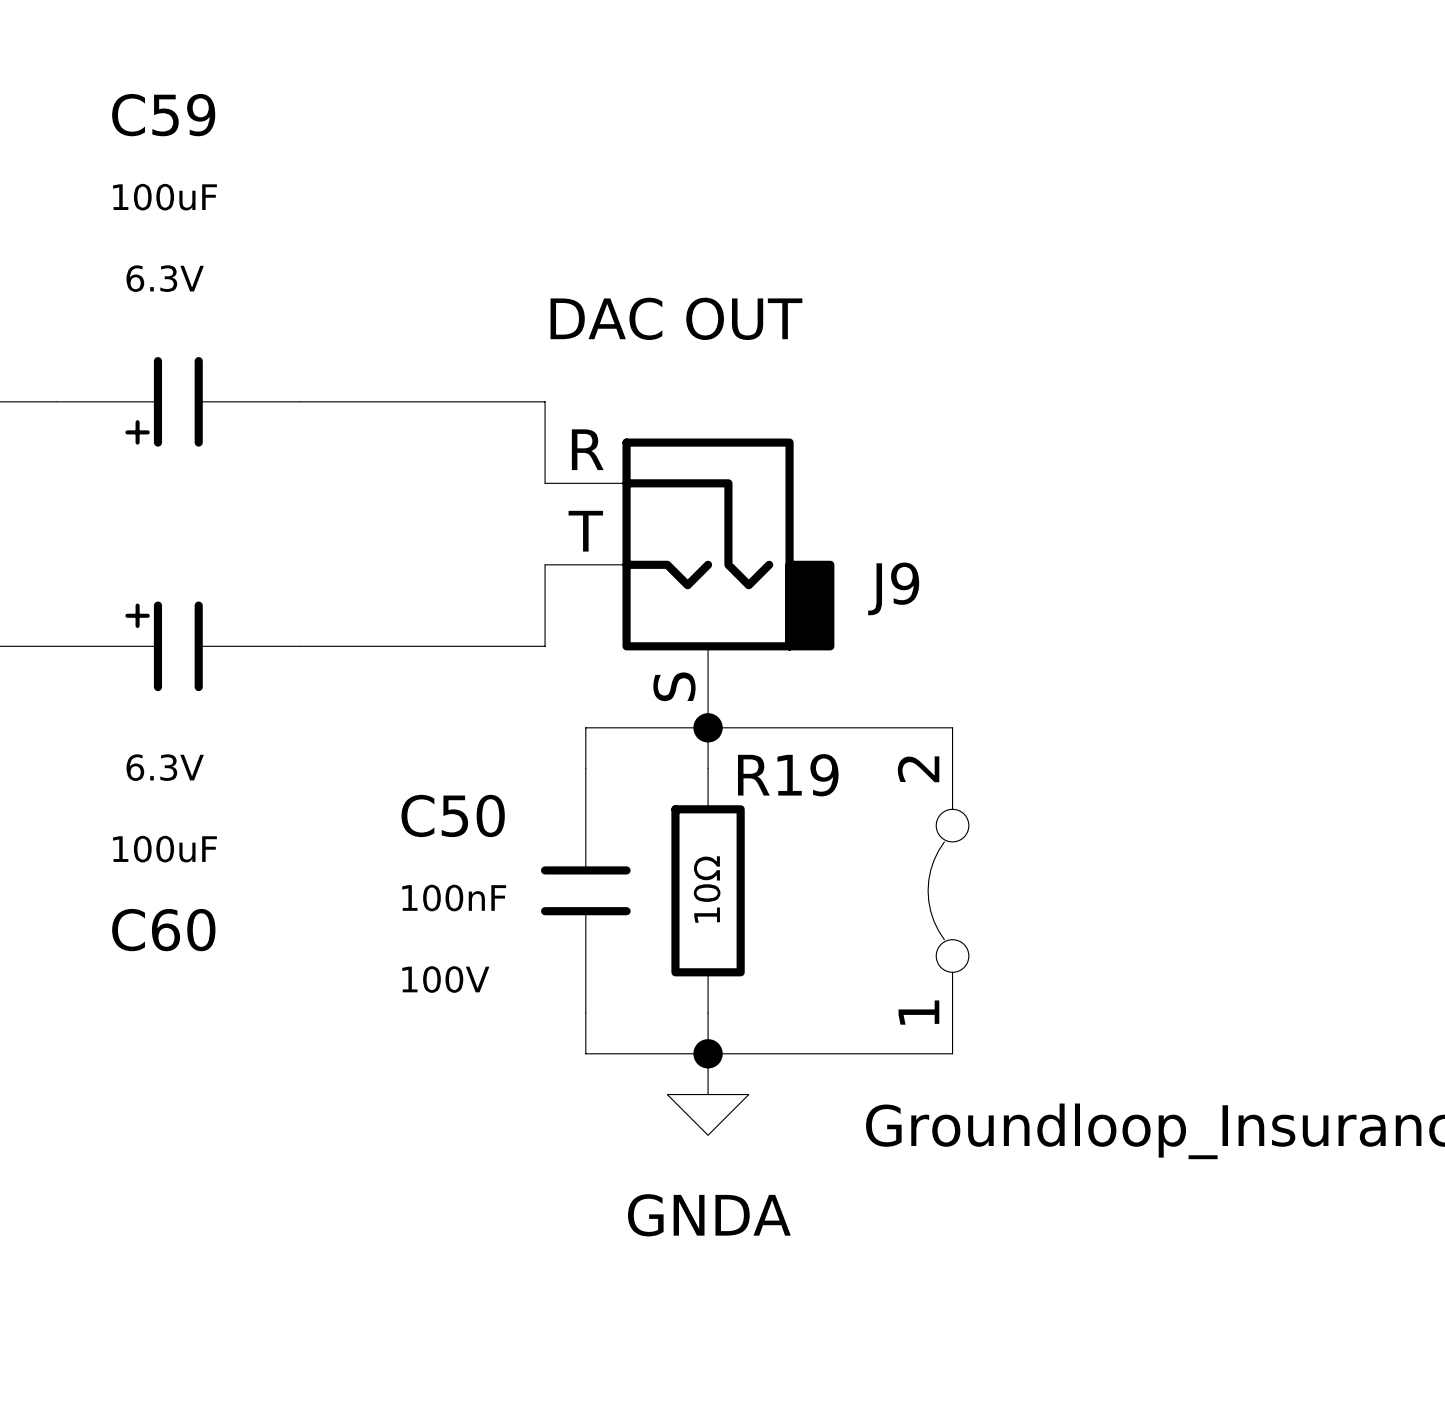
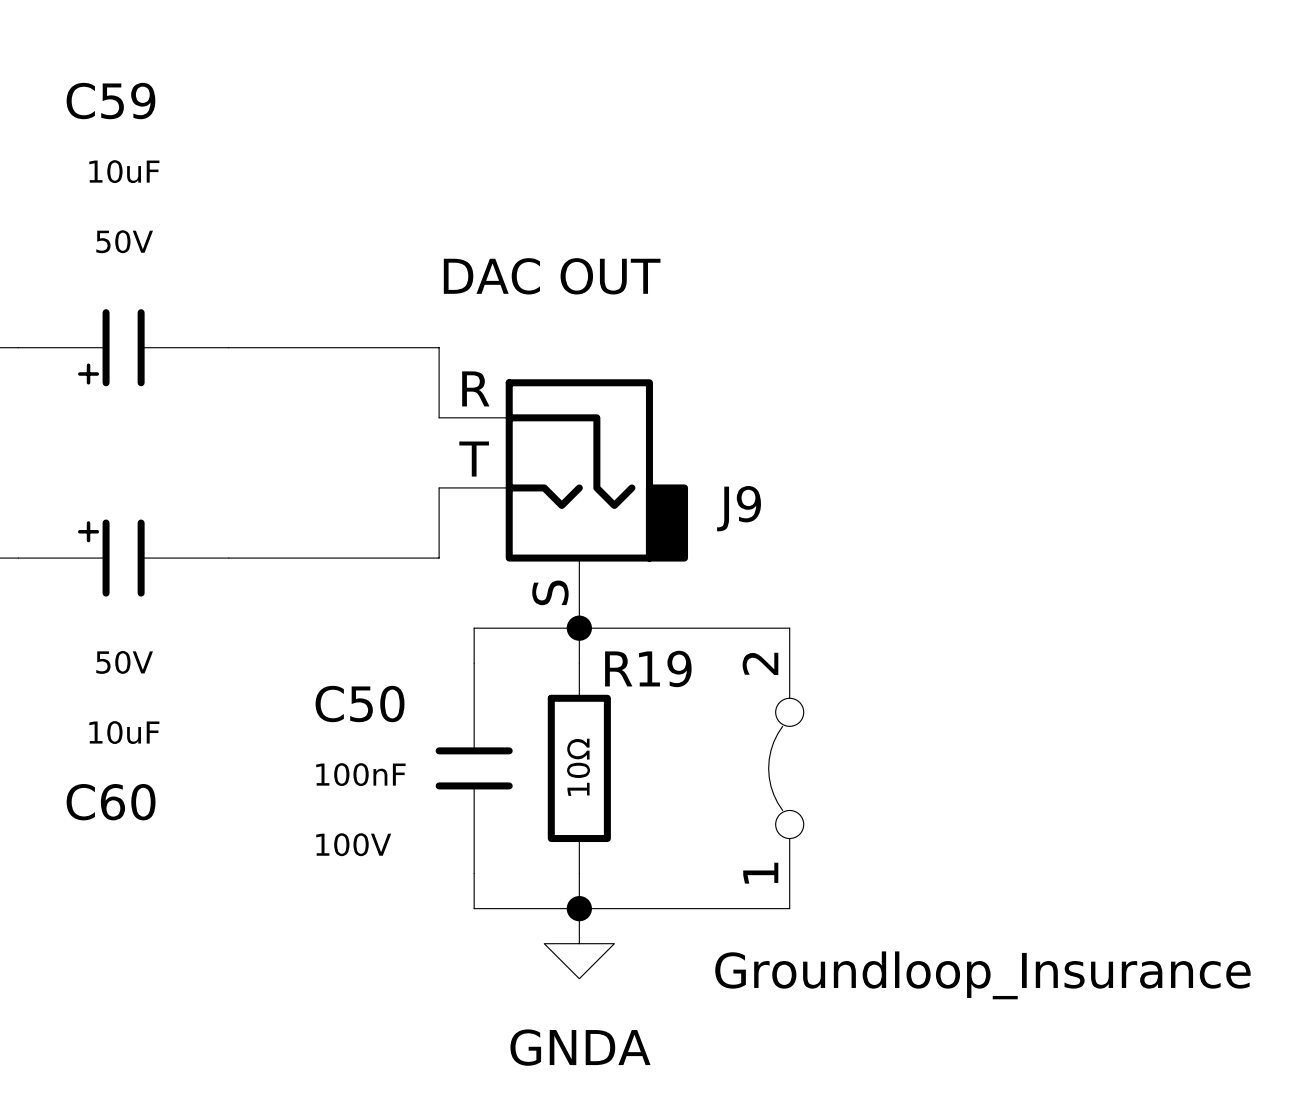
C59 value: 100uF (164, 197) -> 10uF (124, 171)
C59 text: 6.3V (165, 278) -> none
C59 text: none -> 50V (124, 241)
C60 text: 6.3V (165, 767) -> none
C60 text: none -> 50V (124, 662)
C60 value: 100uF (164, 849) -> 10uF (124, 732)

